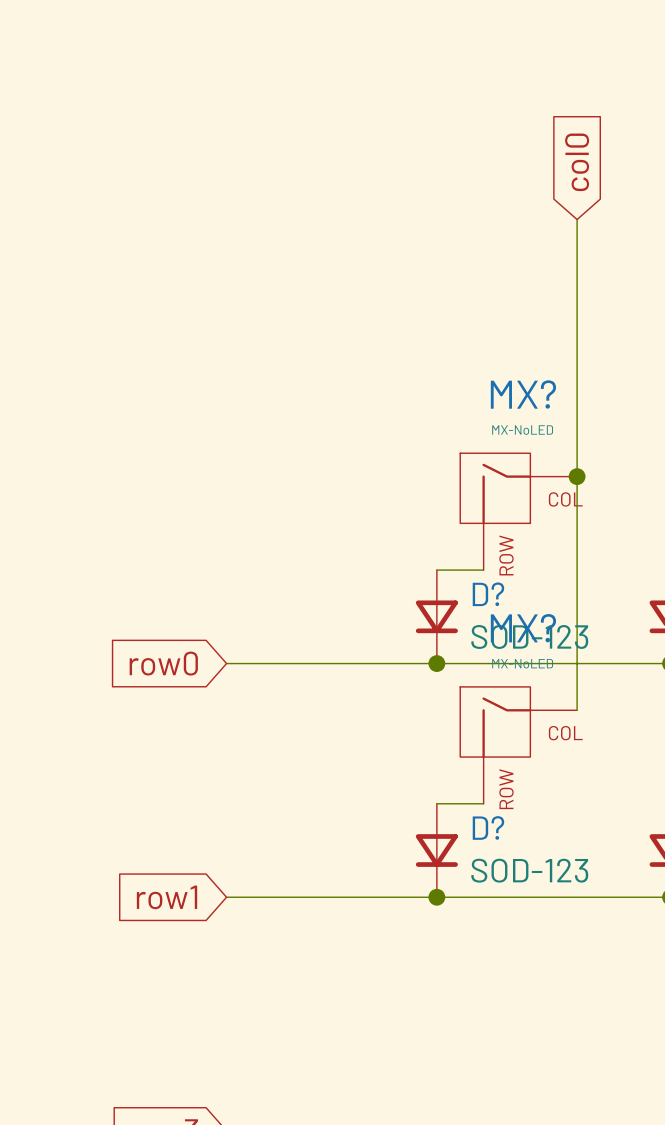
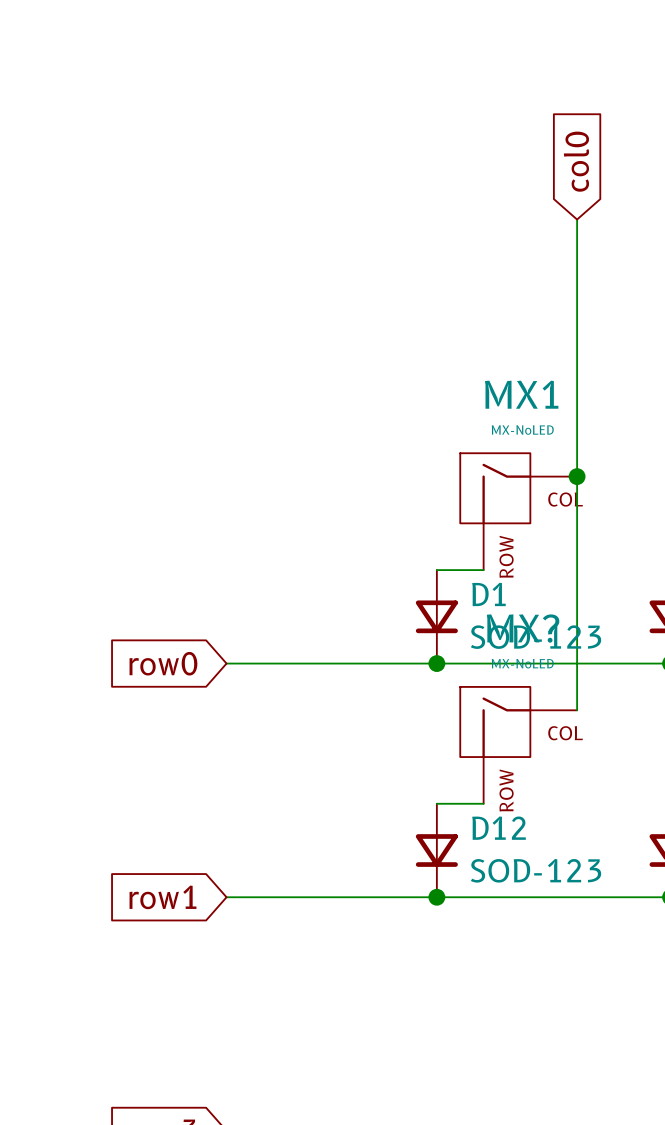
MX? name: MX? (523, 394) -> MX1 (521, 394)
D? name: D? (488, 594) -> D1 (488, 594)
D? name: D? (488, 827) -> D12 (499, 828)

